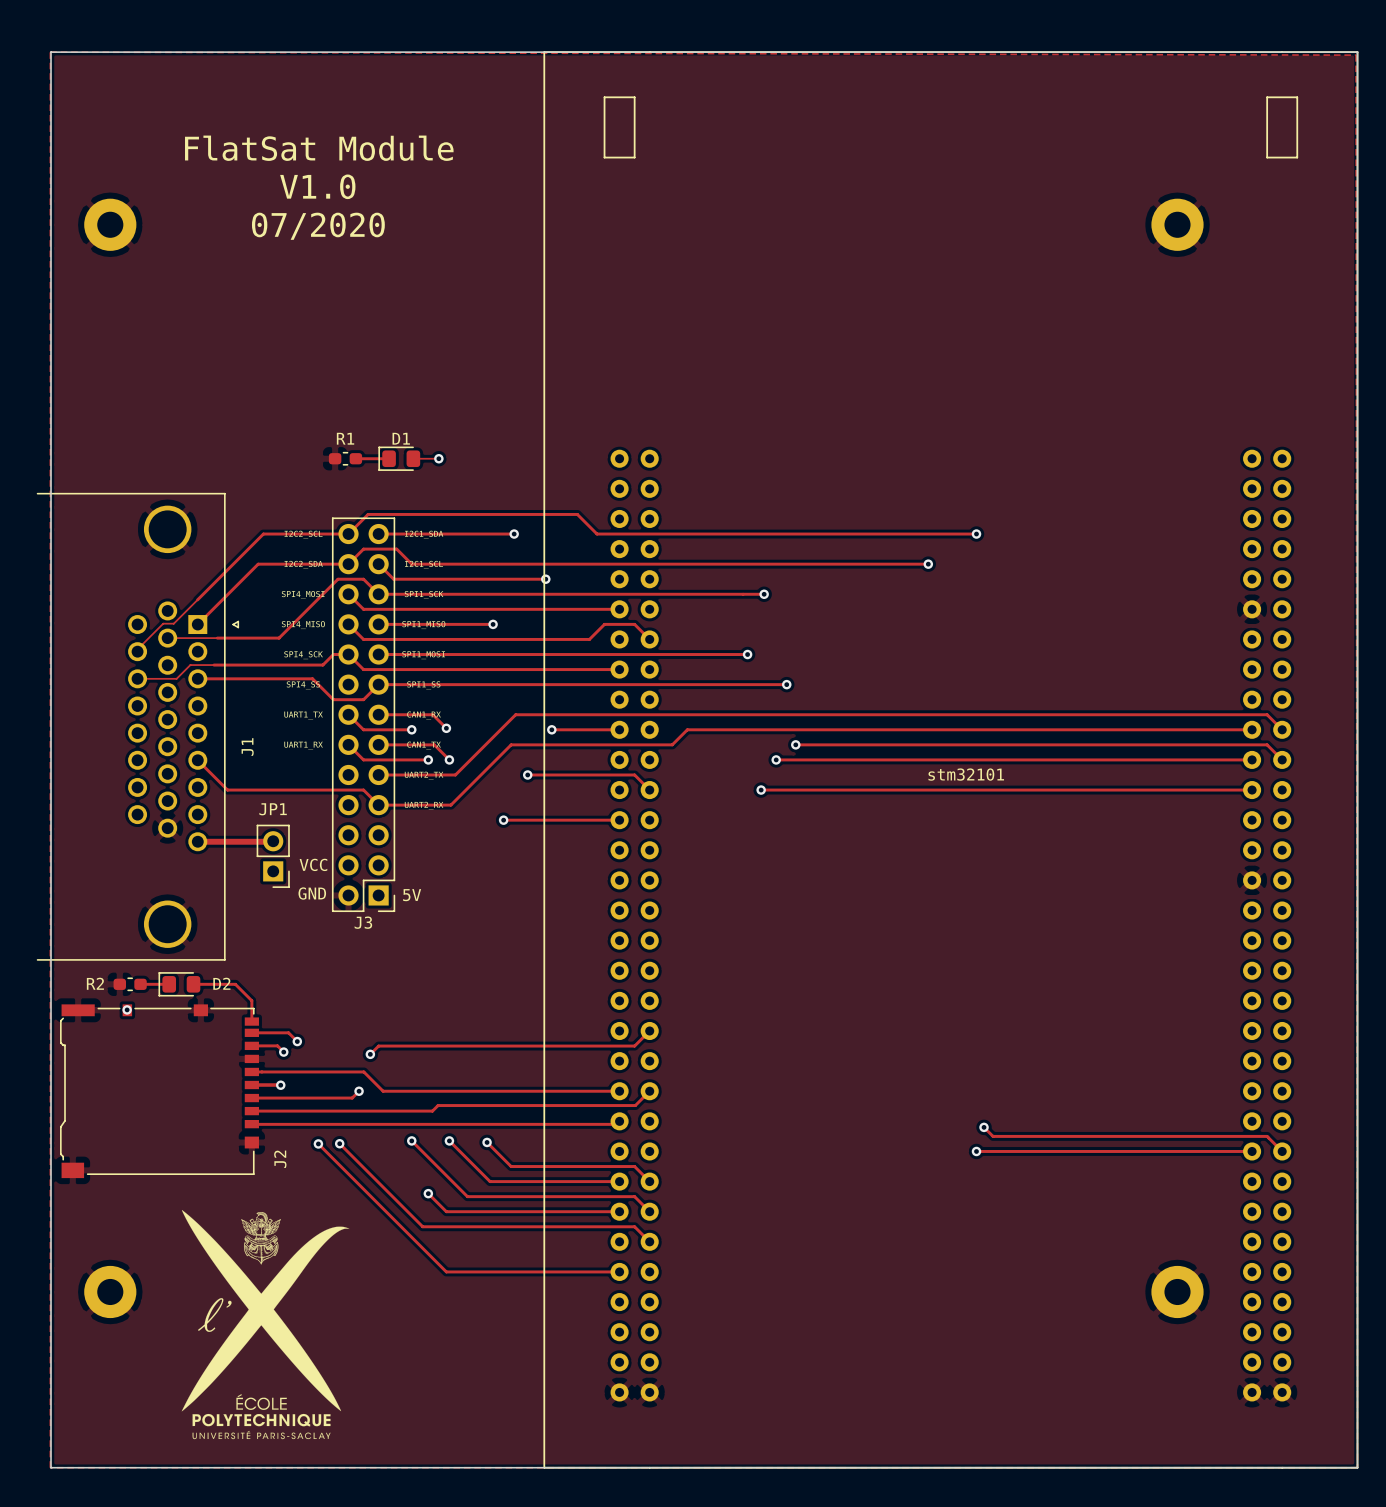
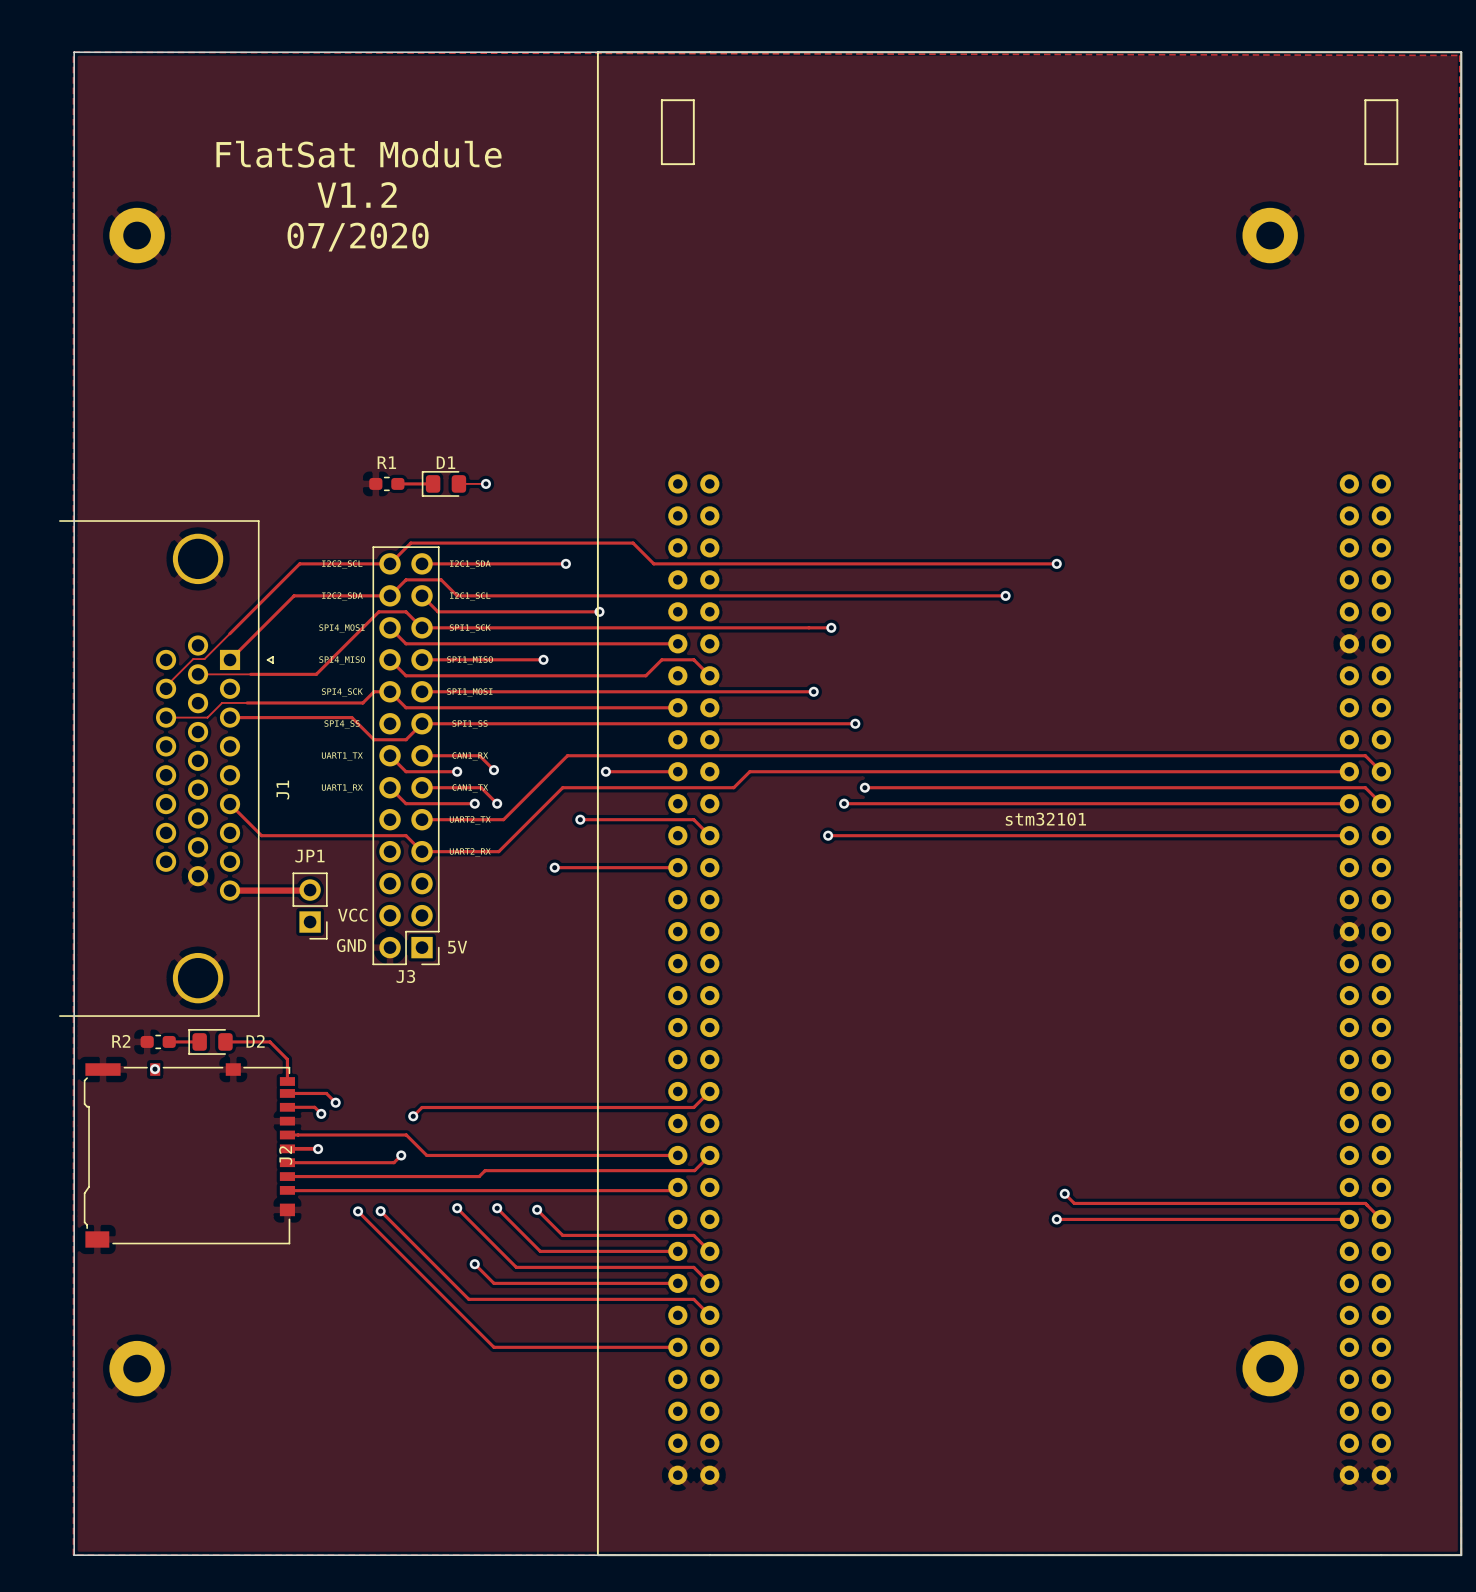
text: V1.0 (317, 186) -> V1.2 (357, 194)
J2 name position: J2 (280, 1159) -> J2 (285, 1155)
drawing: [181, 1210, 350, 1440] -> none

